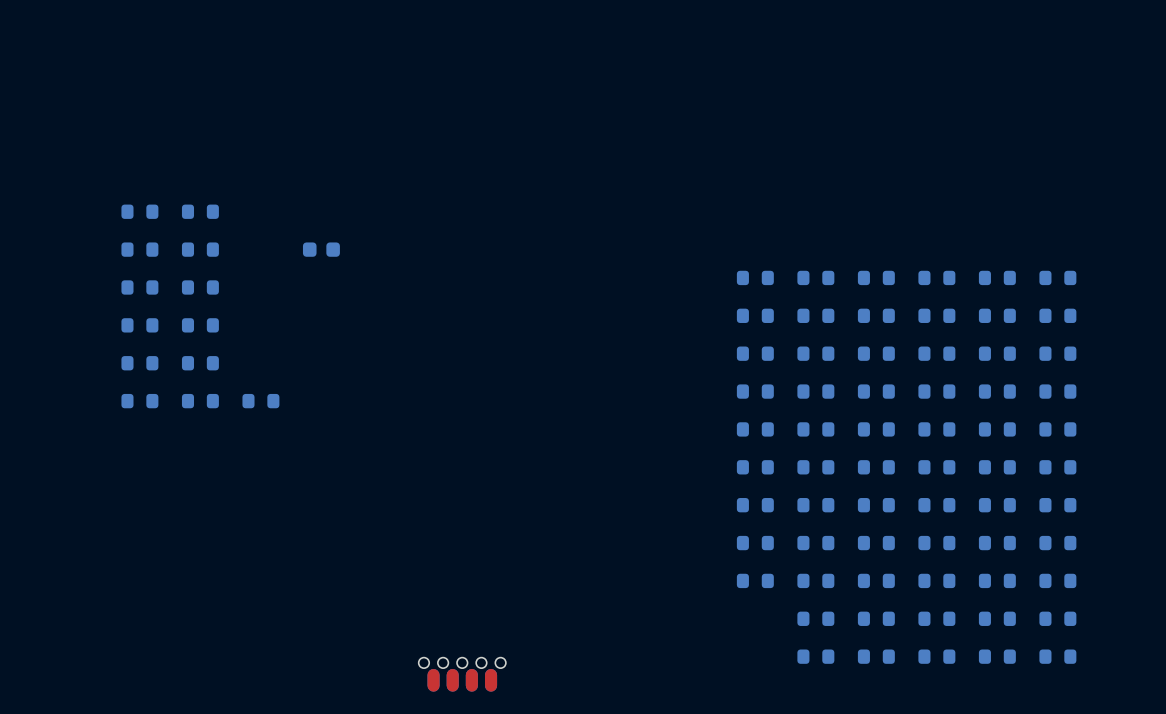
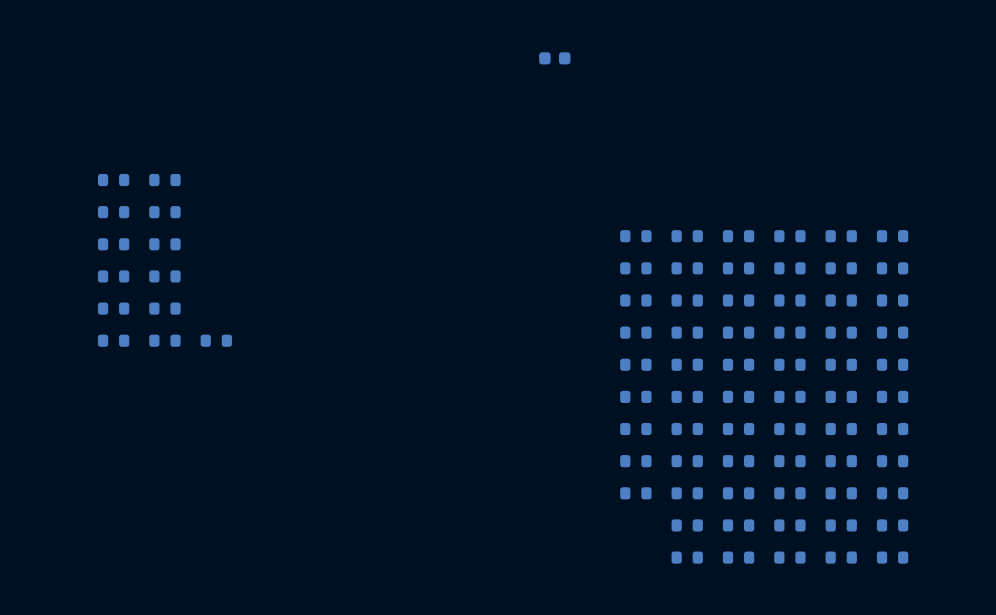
part: none -> (554, 58)
part: (321, 249) -> none
part: (462, 674) -> none

